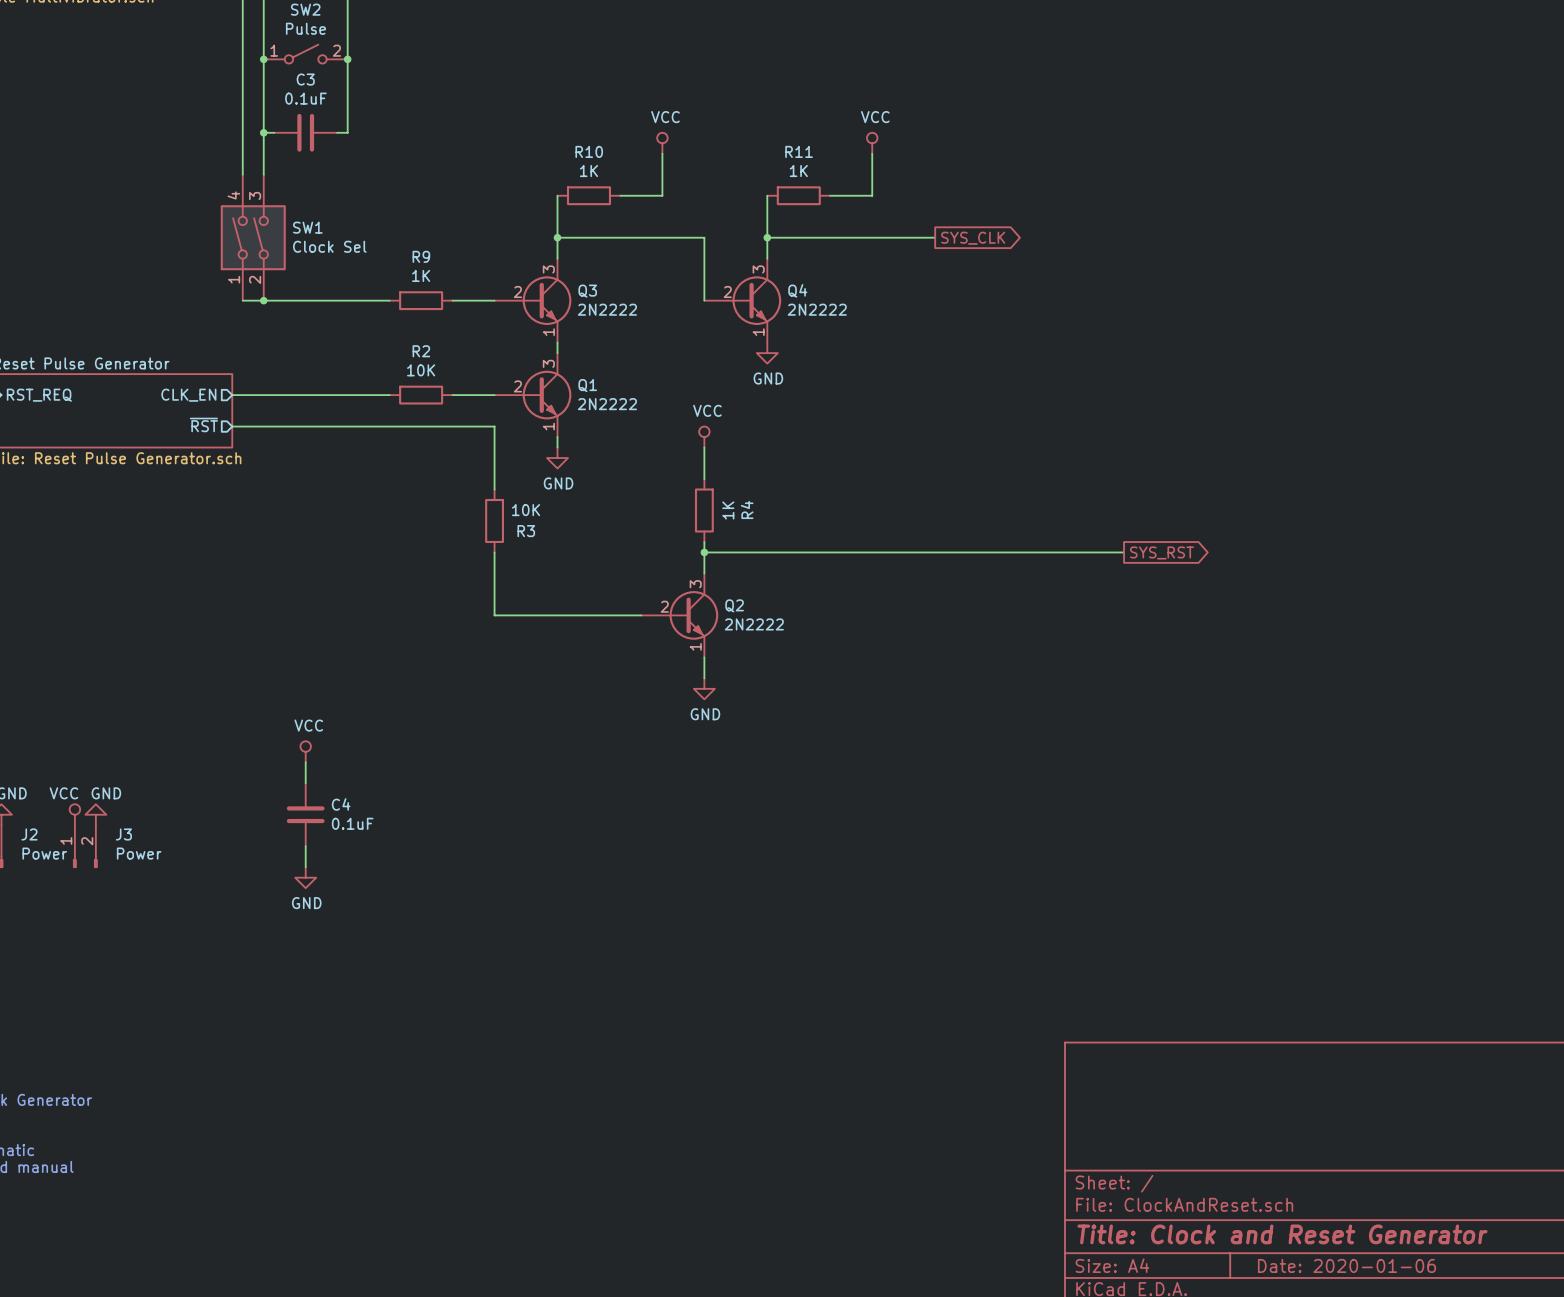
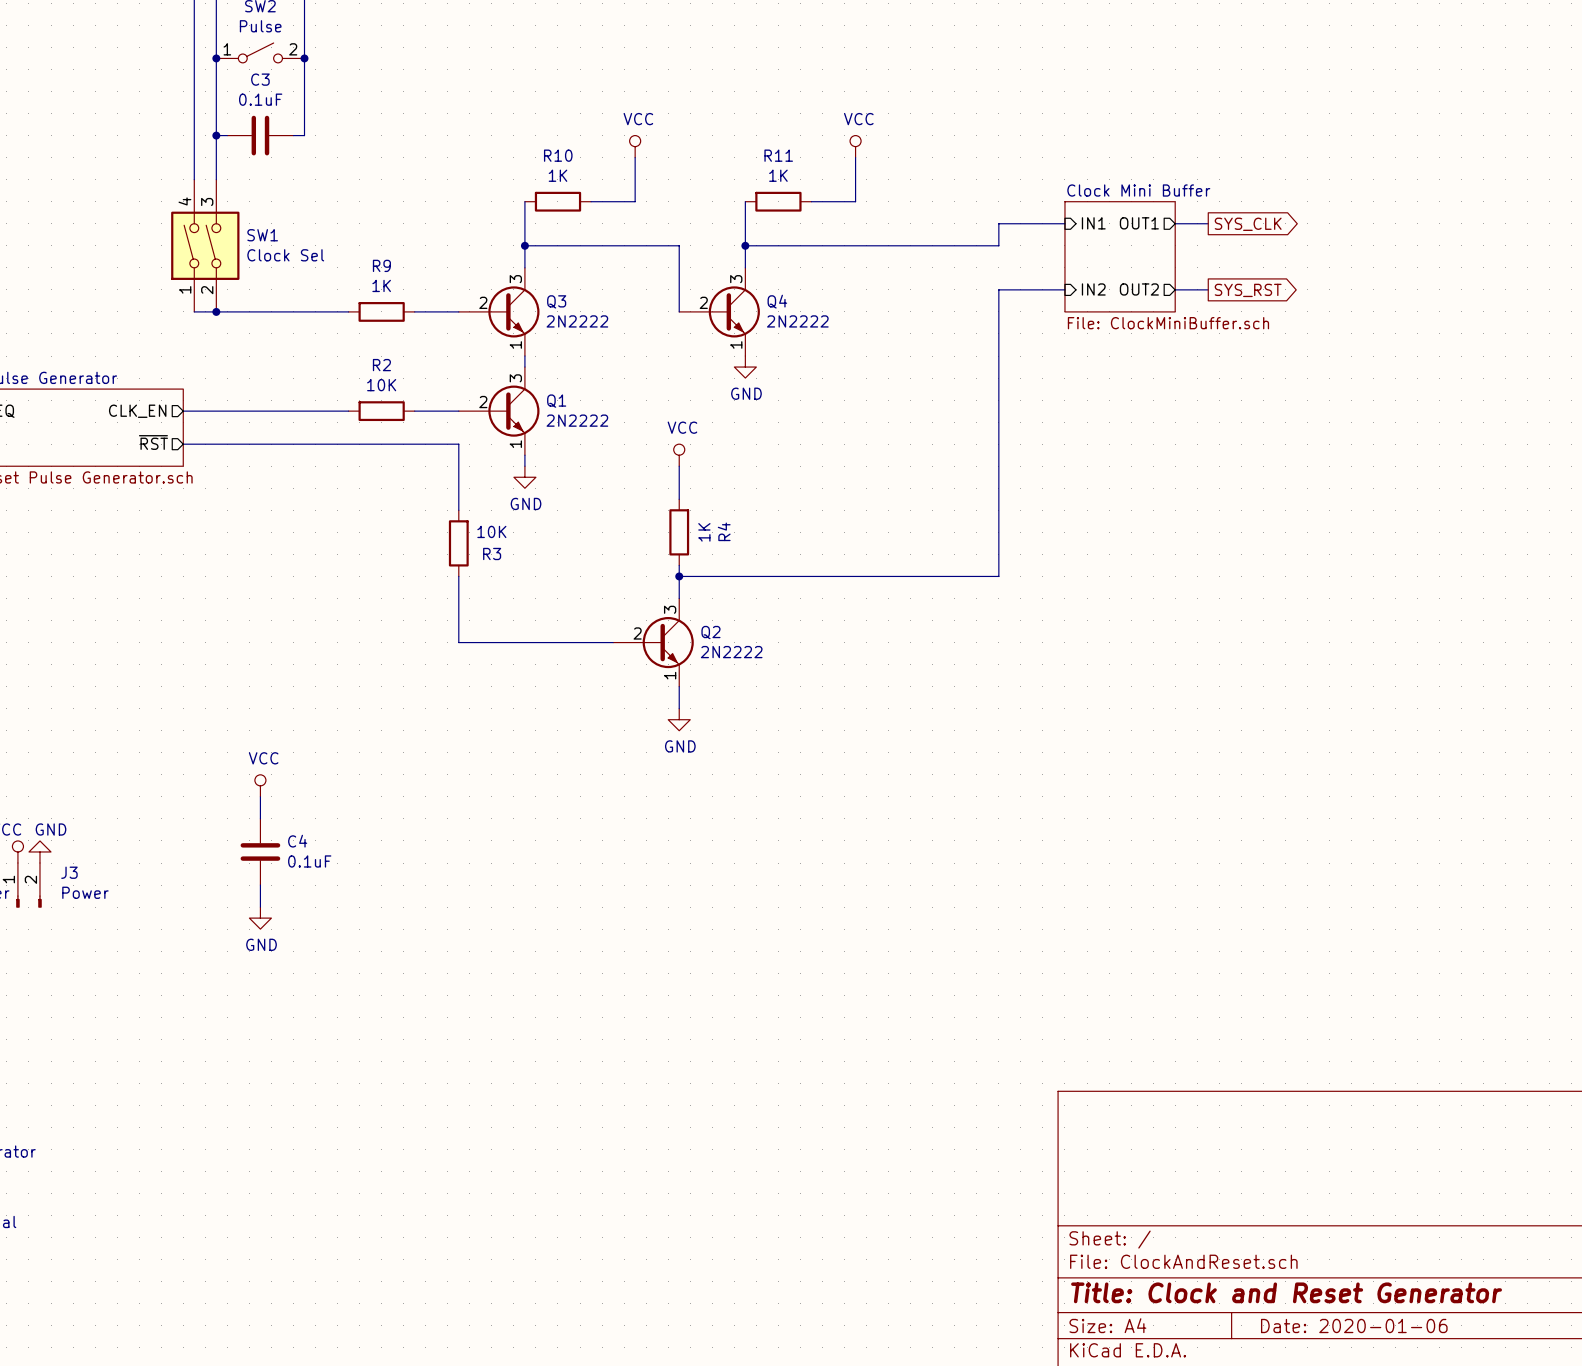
wire: none -> (1064, 223) (998, 223) (998, 245) (921, 245)
sheet pin: none -> IN1 (1093, 223)
sheet pin: none -> OUT1 (1139, 223)
wire: none -> (1175, 223) (1208, 223)
global label: none -> SYS_CLK (1248, 224)
global label: SYS_CLK (973, 238) -> none
sheet Clock Mini Buffer: none -> File: ClockMiniBuffer.sch (1120, 256)
sheet pin: none -> IN2 (1093, 289)
sheet pin: none -> OUT2 (1139, 289)
wire: none -> (1175, 289) (1208, 289)
global label: none -> SYS_RST (1248, 290)
wire: (1008, 552) (1124, 552) -> (998, 576) (998, 289) (1064, 289)
global label: SYS_RST (1162, 552) -> none

